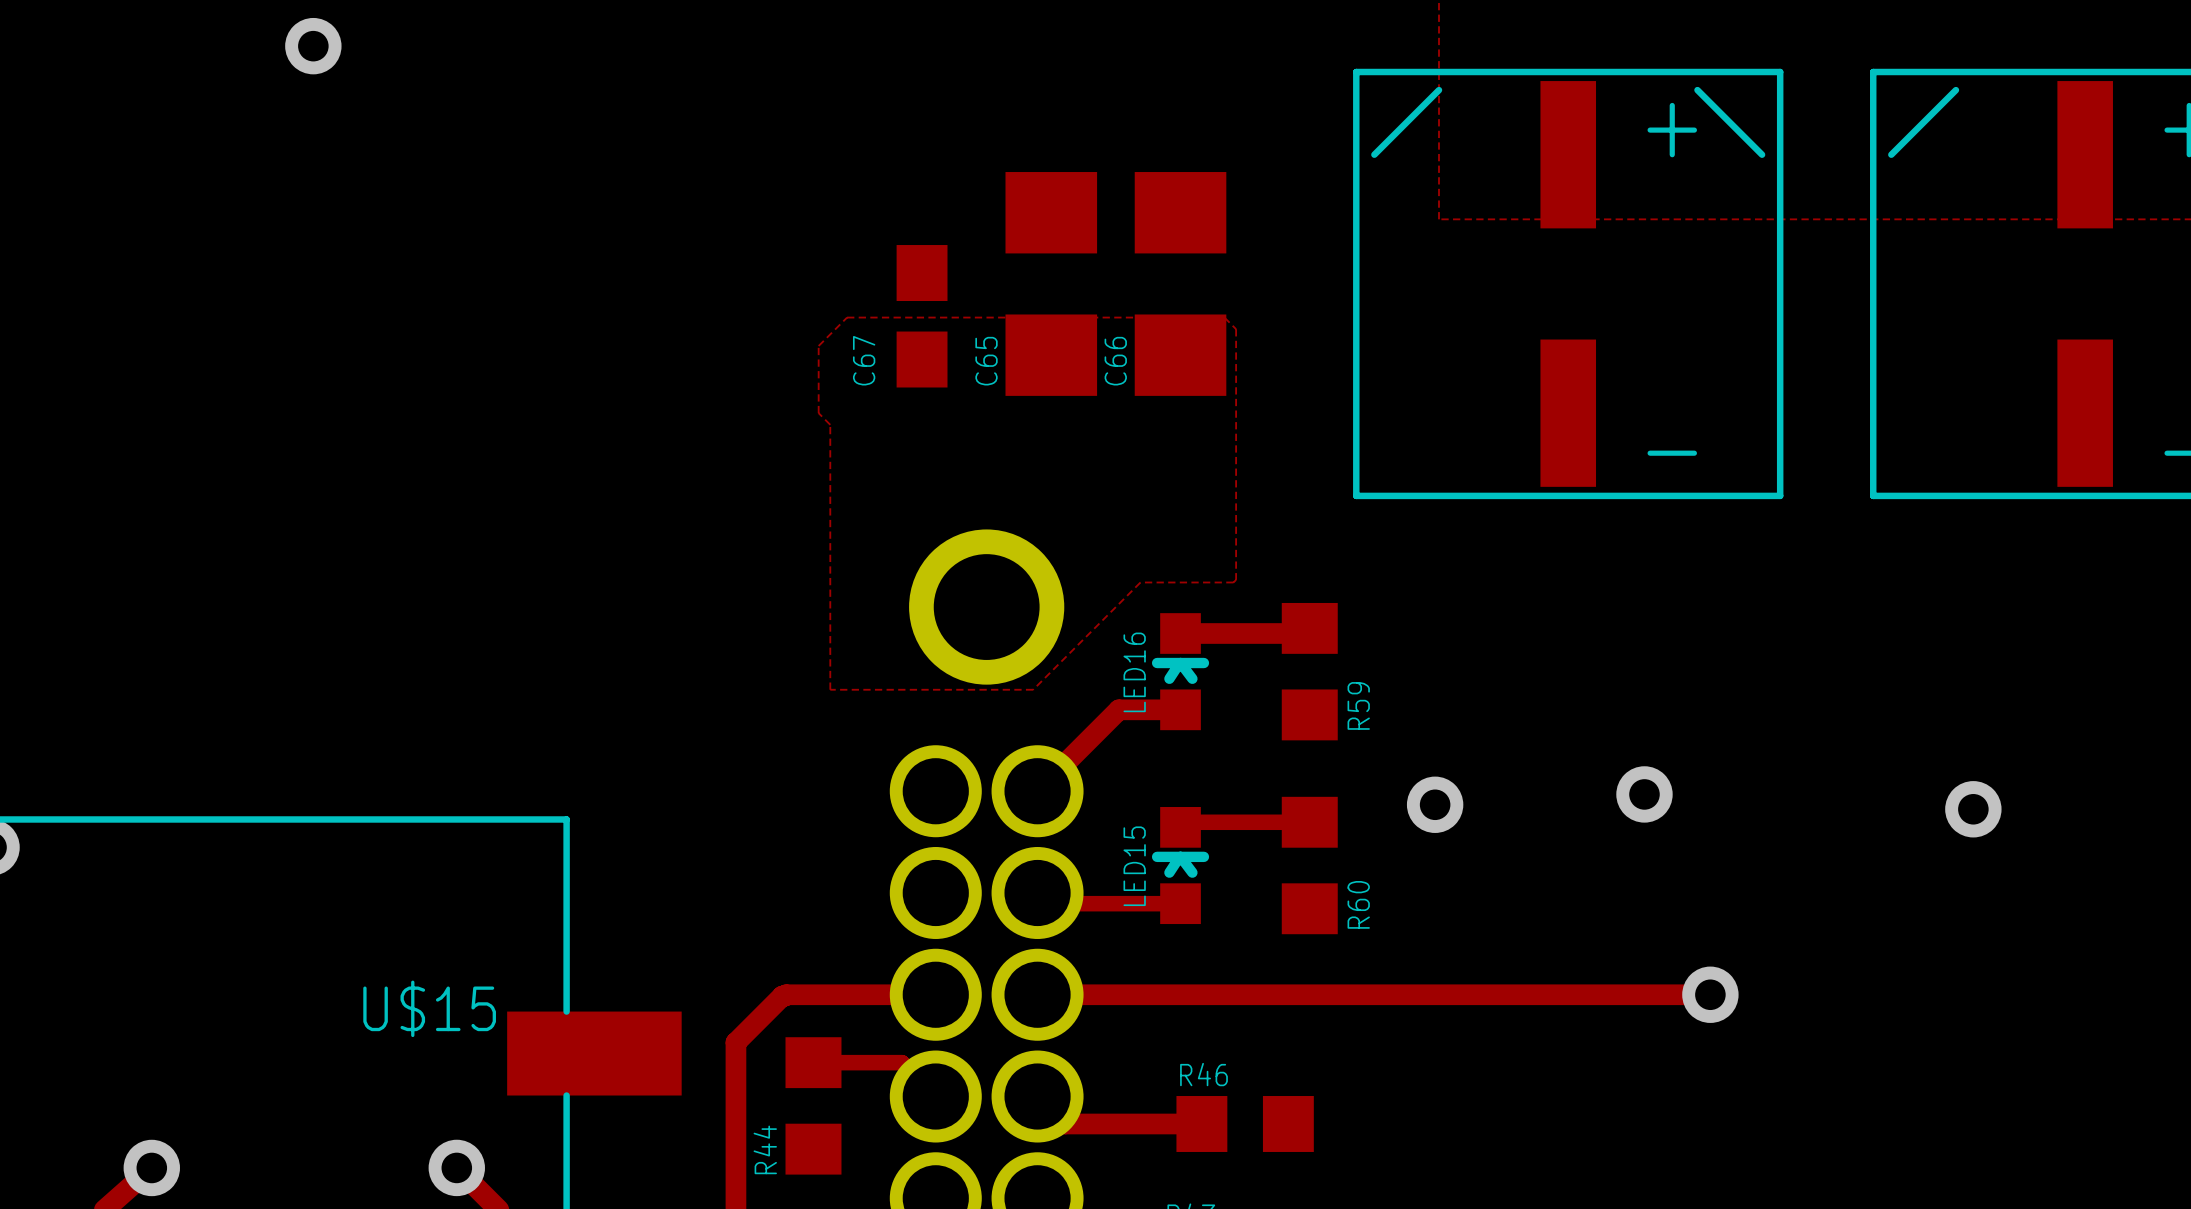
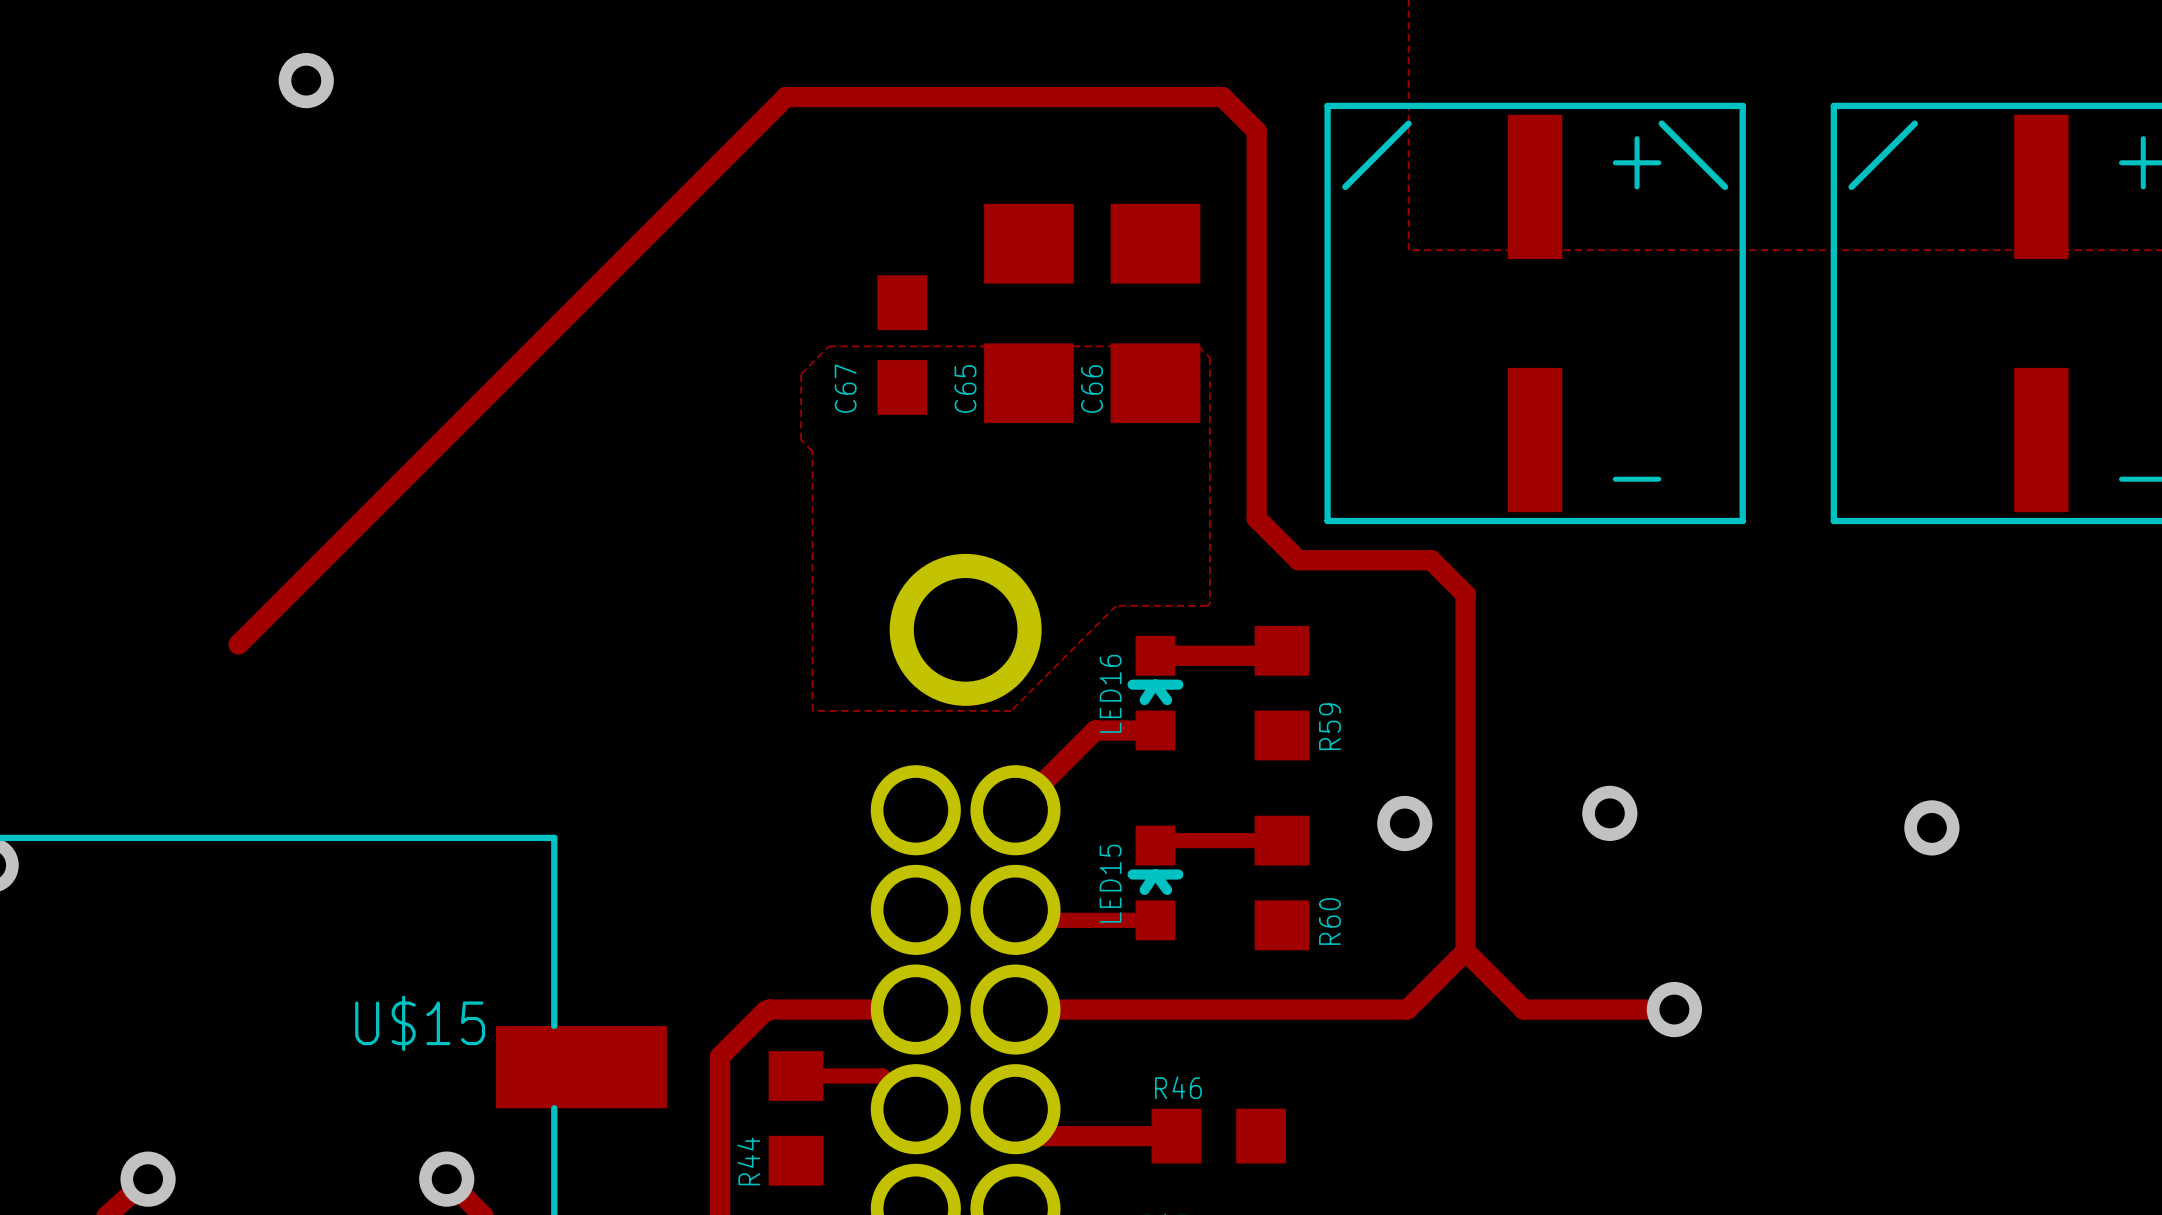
track: none -> (238, 644) (785, 97) (1222, 97) (1256, 131) (1256, 518) (1298, 560) (1431, 560) (1465, 594) (1465, 951)
track: none -> (1465, 951) (1523, 1009)
track: (1437, 994) (1556, 994) -> (1407, 1009) (1465, 951)

